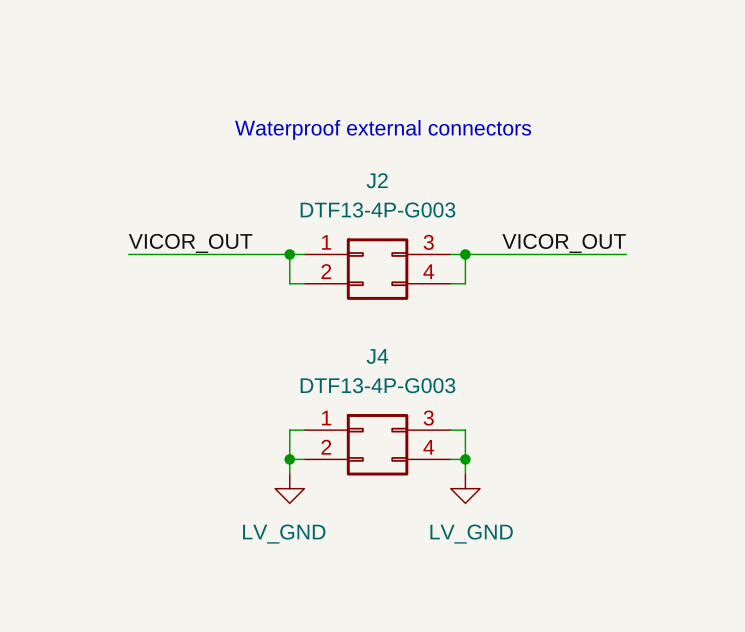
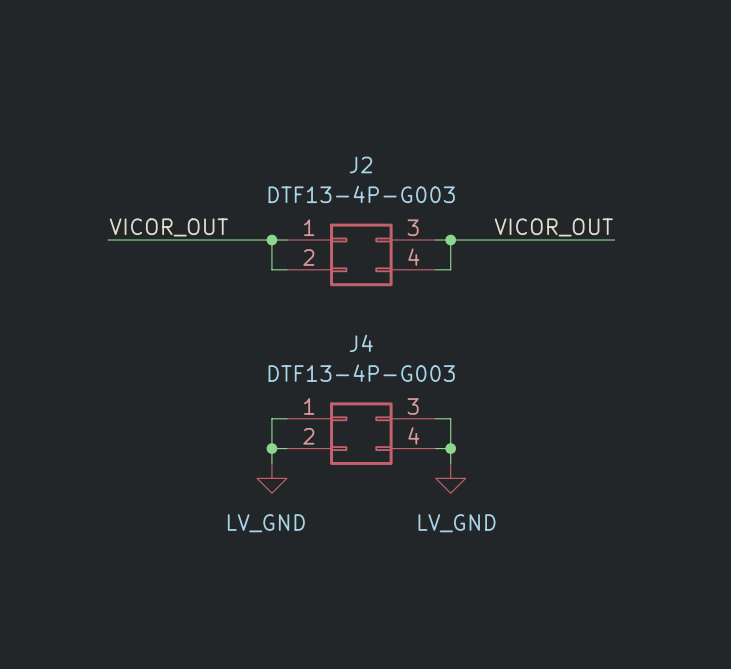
text: Waterproof external connectors (383, 129) -> none

